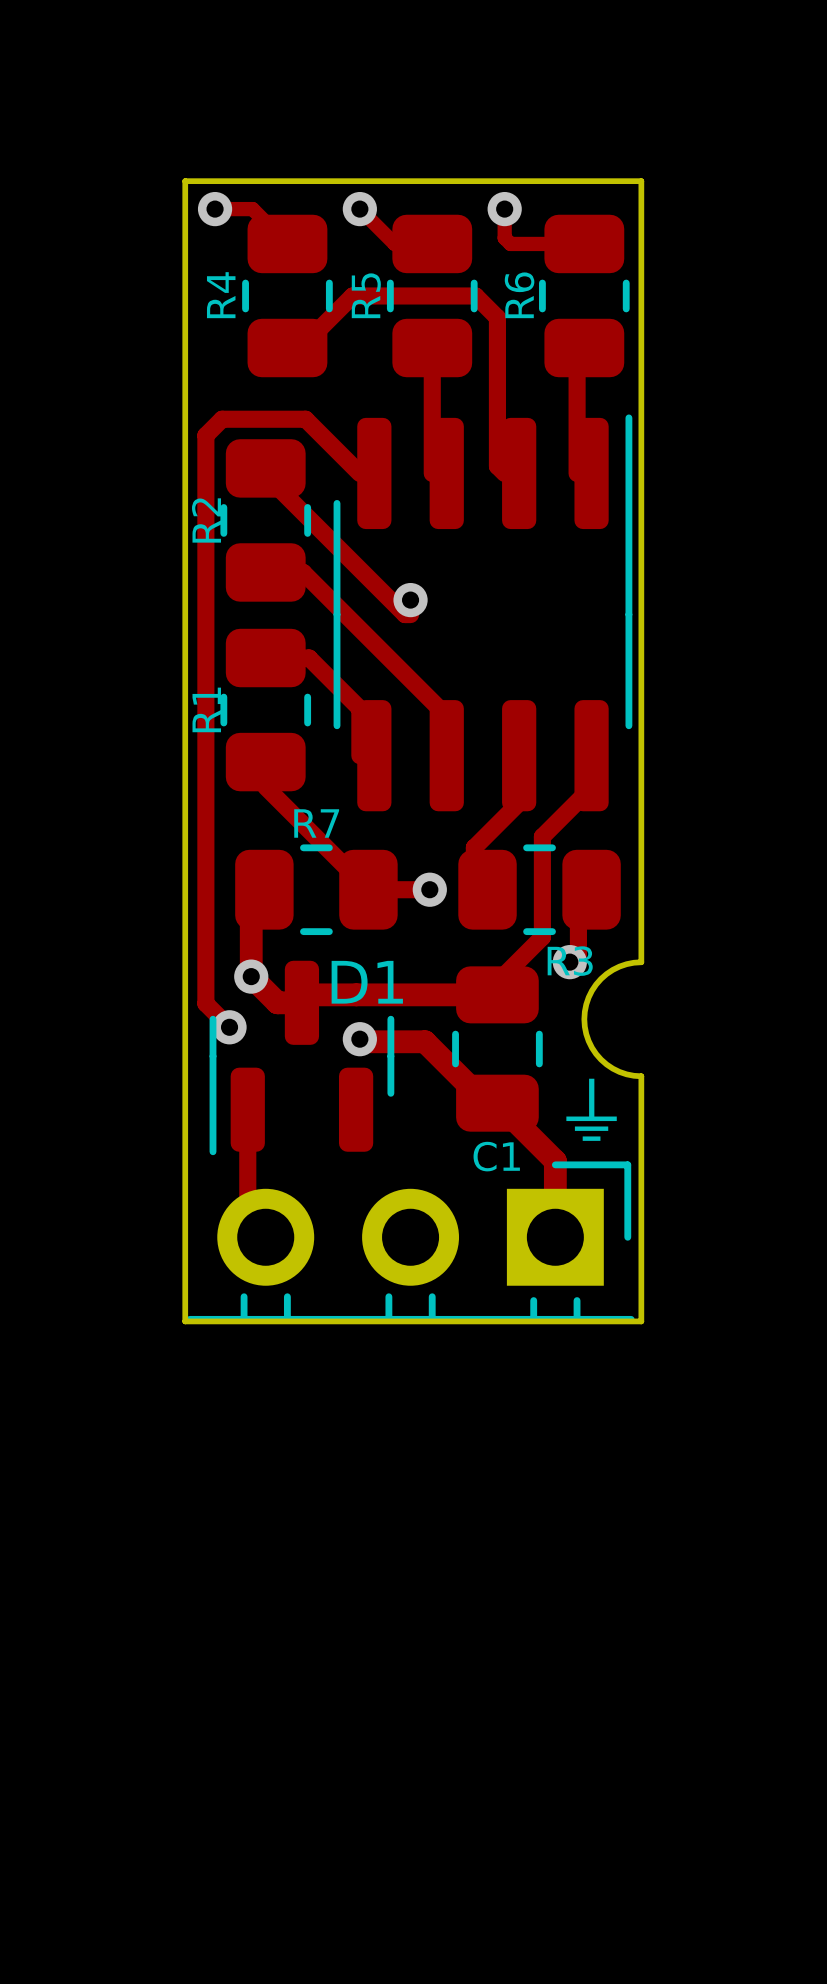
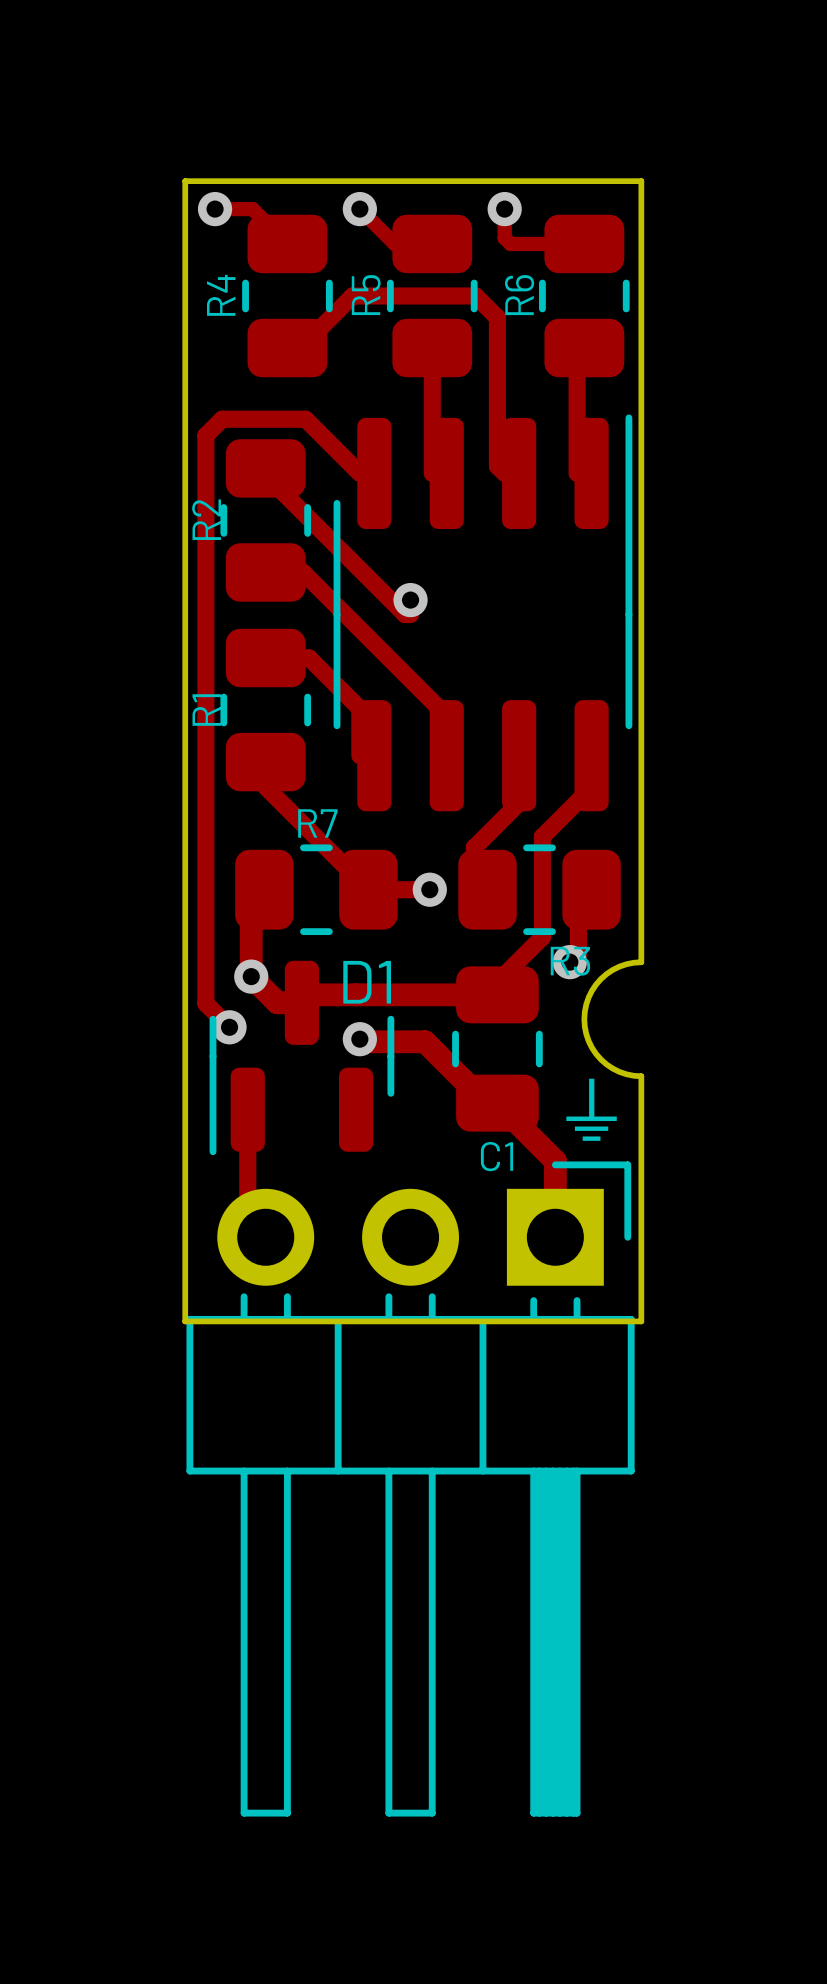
part: (410, 1242) -> none
part: none -> (410, 1488)

